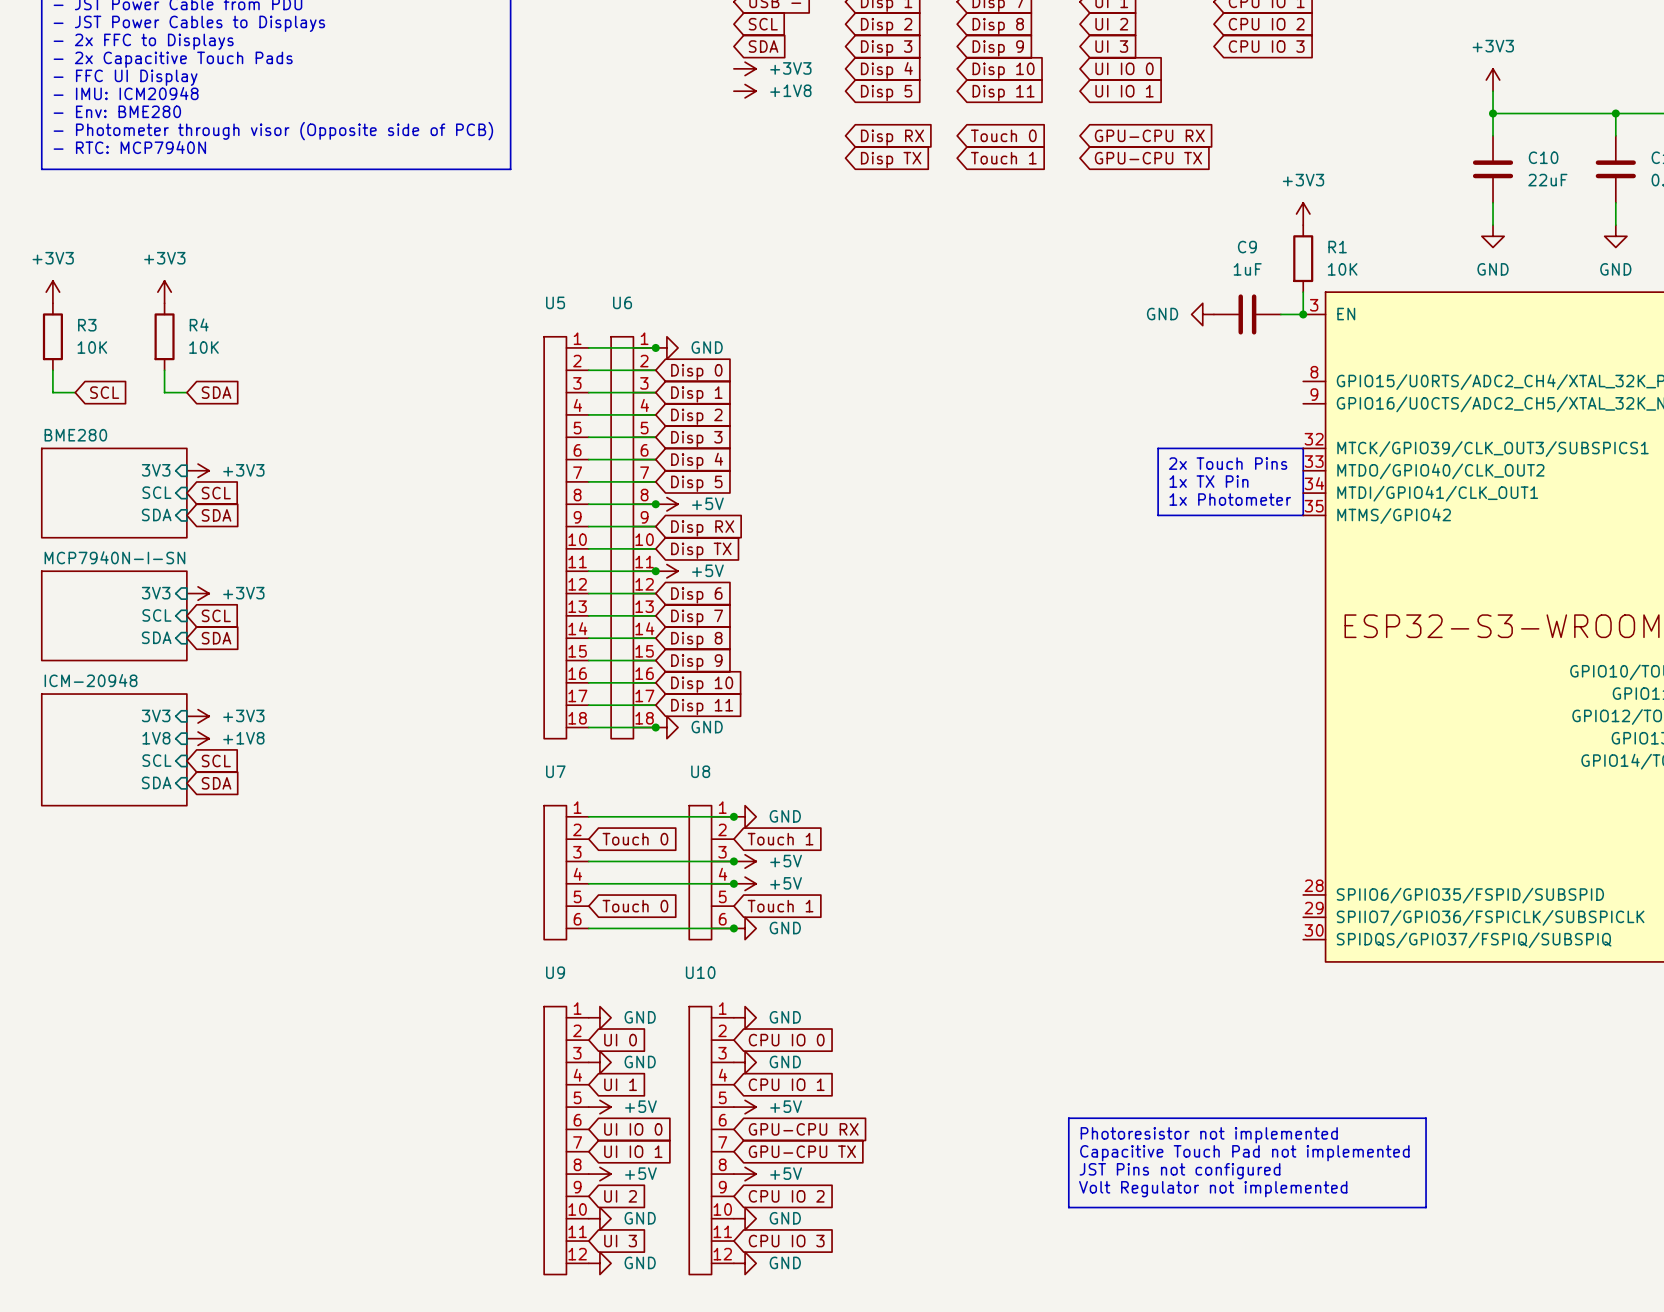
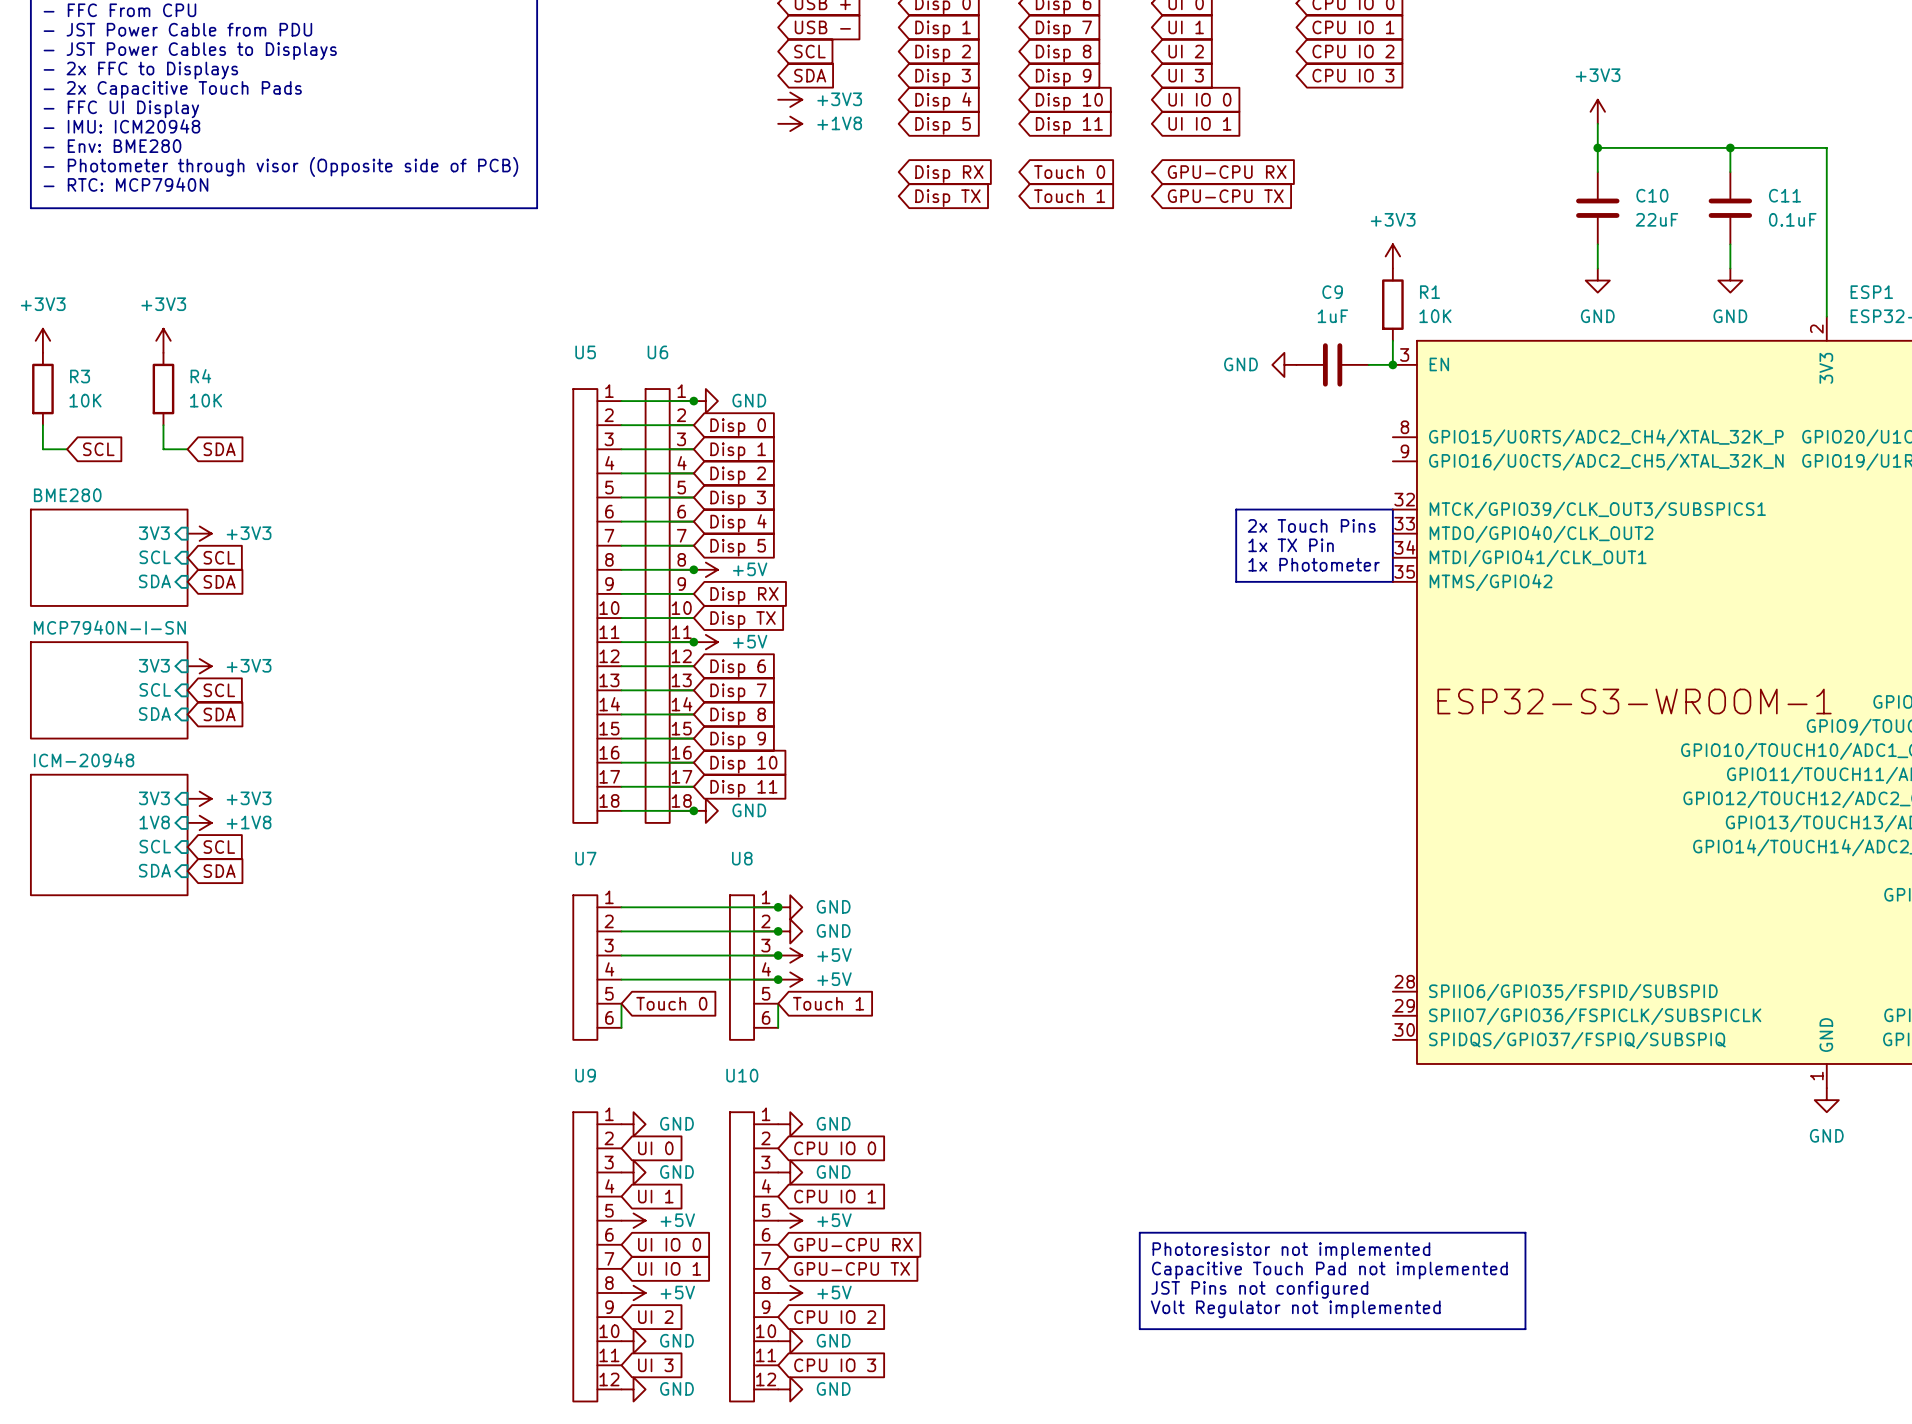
wire: none -> (621, 931) (778, 931)
global label: Touch 0 (635, 839) -> none
junction: none -> (778, 931)
global label: Touch 1 (780, 839) -> none
wire: none -> (778, 1003) (778, 1027)
wire: (588, 928) (733, 928) -> (621, 1027) (621, 1003)
junction: (733, 928) -> none
power symbol position: GND (745, 928) -> GND (790, 931)

